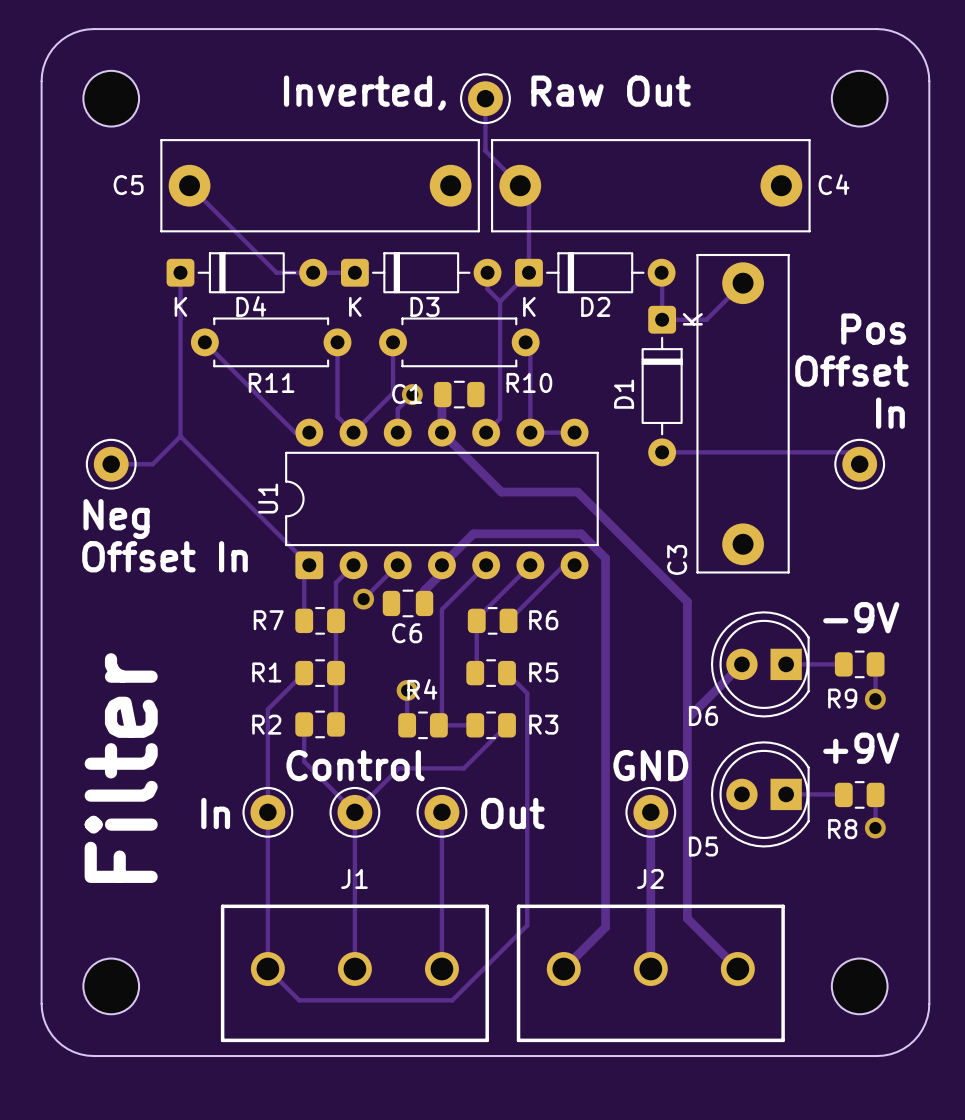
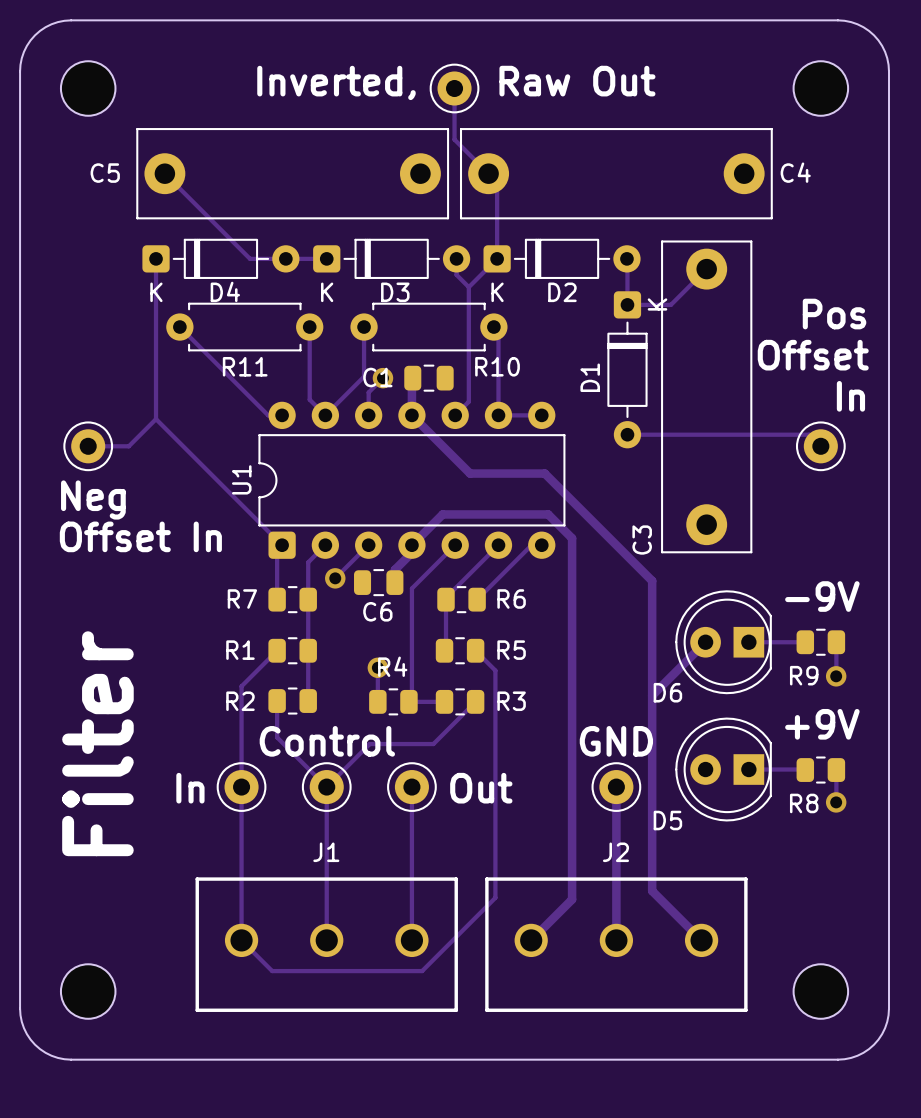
part position: (111, 986) -> (88, 991)
part position: (859, 986) -> (820, 991)
board edge: (41, 1003) (45, 1023) (56, 1040) (73, 1052) (93, 1056) (877, 1056) (897, 1052) (914, 1040) (925, 1023) (929, 1003) -> (20, 974) (20, 1015) (26, 1034) (35, 1044) (45, 1052) (57, 1057) (71, 1059) (844, 1059) (857, 1055) (869, 1049) (882, 1034) (888, 1015) (889, 974)

